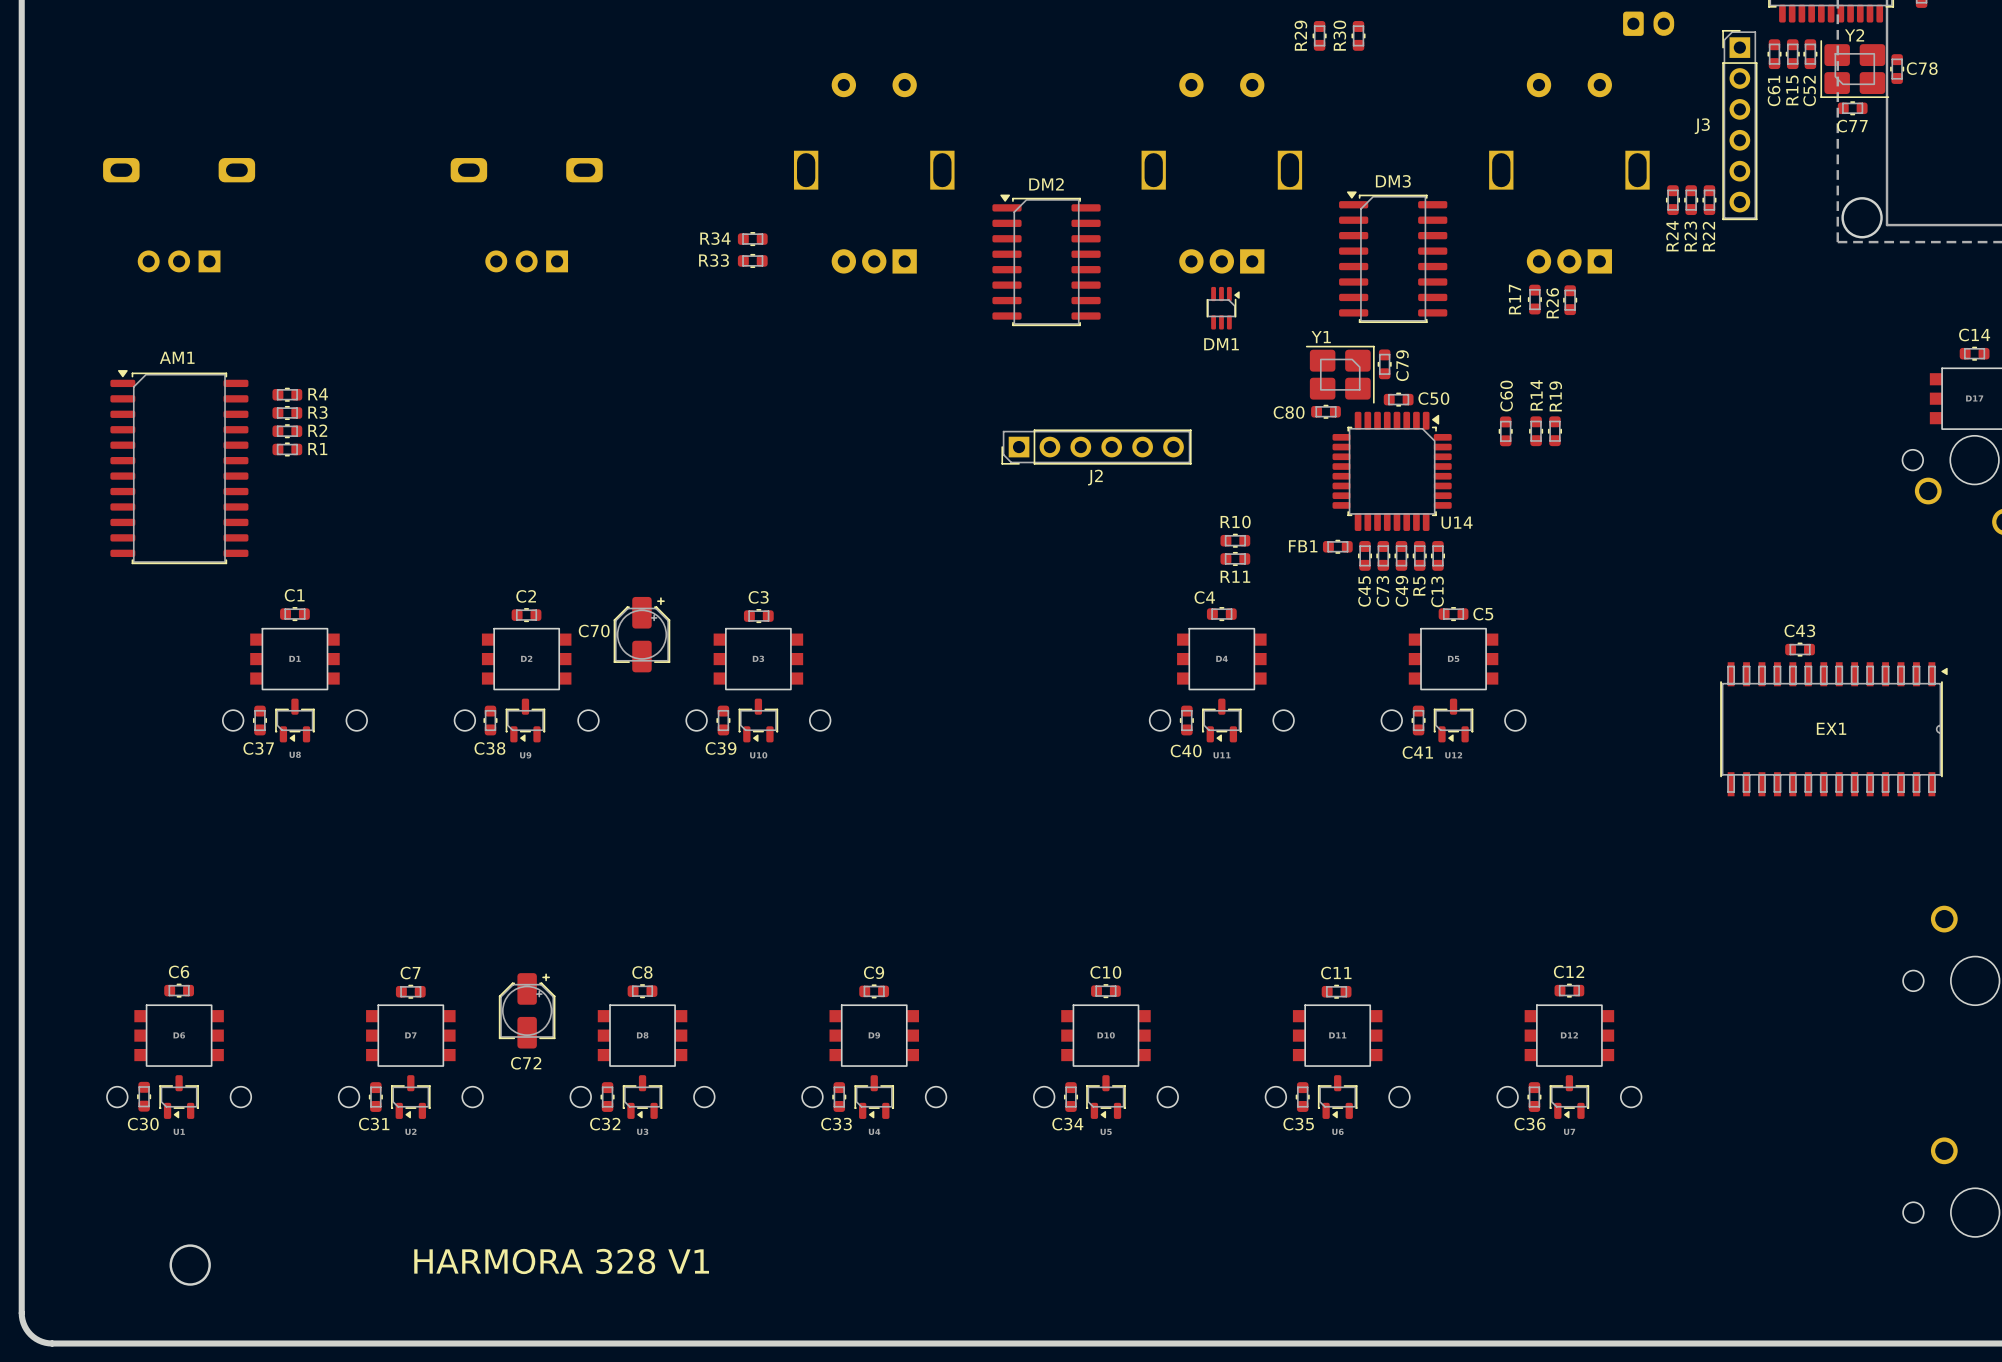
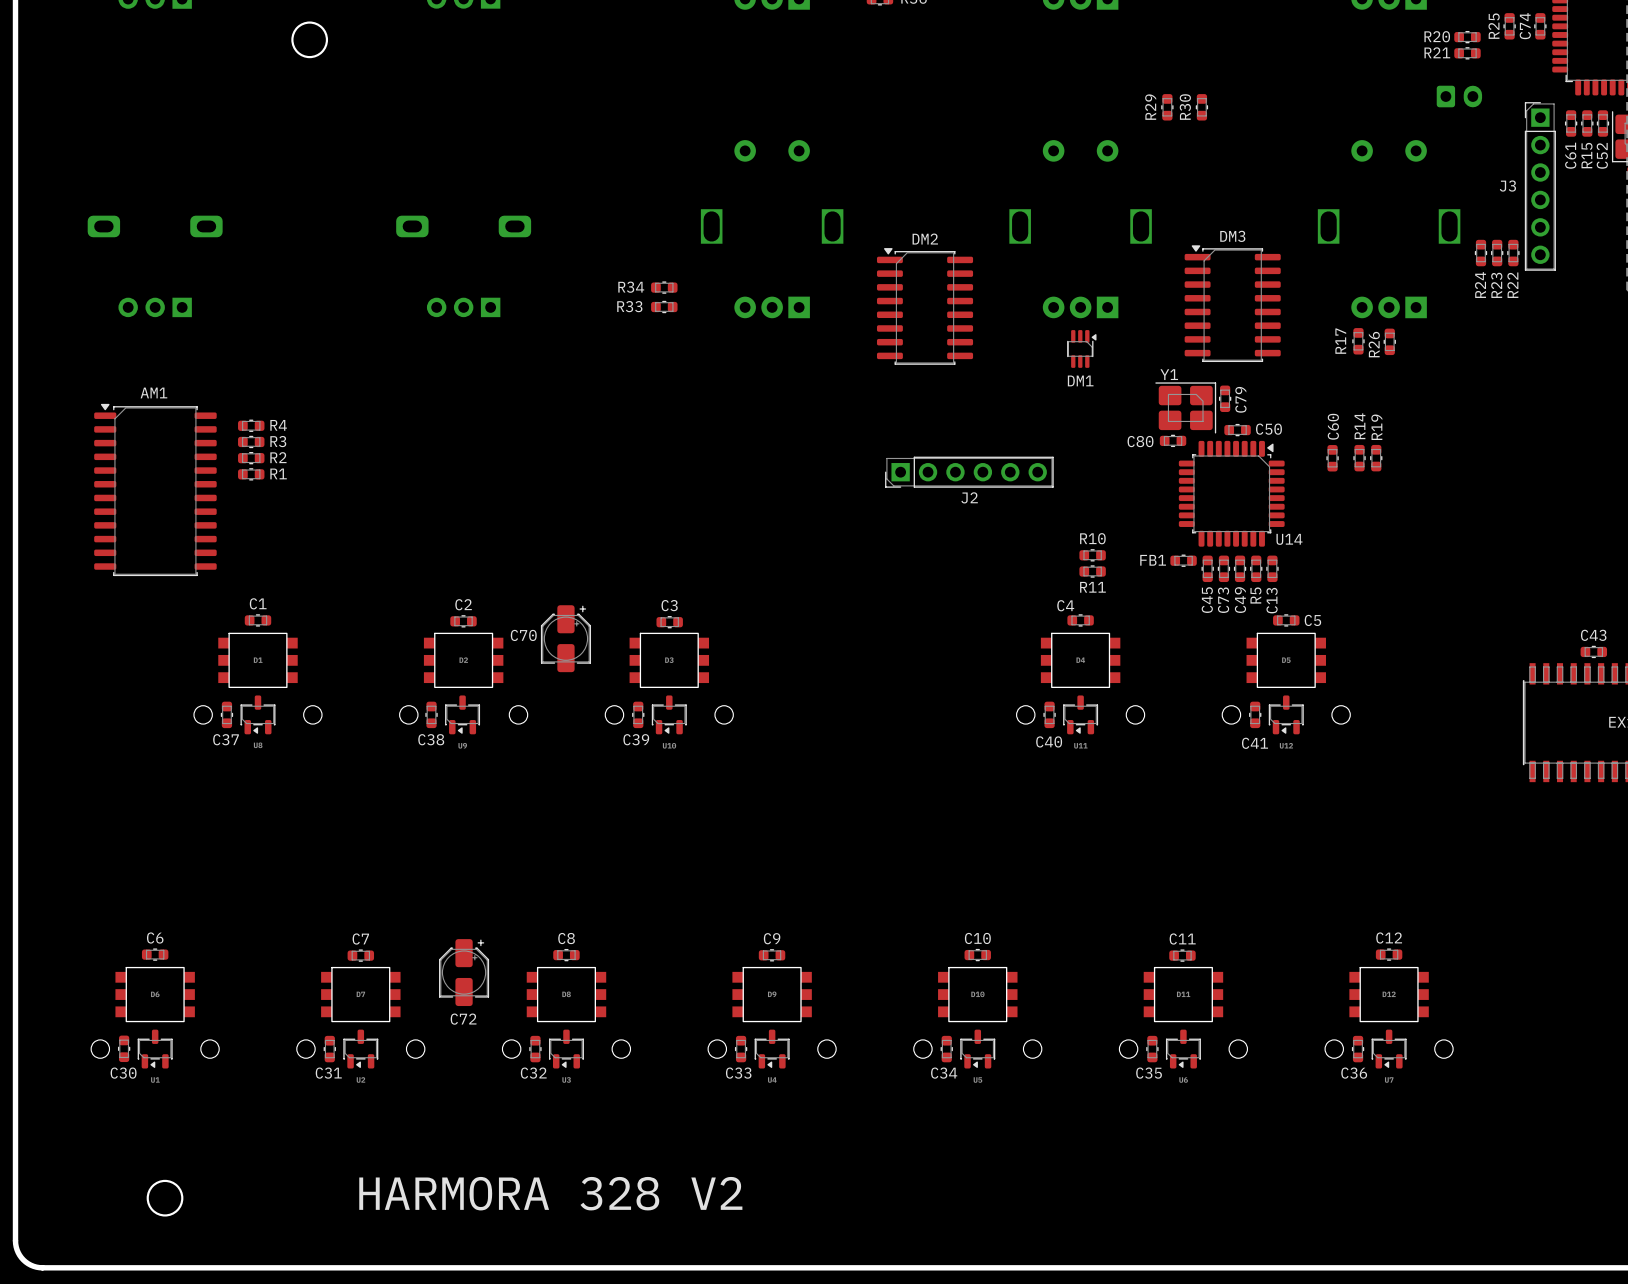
text: HARMORA 328 V1 (561, 1261) -> HARMORA 328 V2 (550, 1193)

